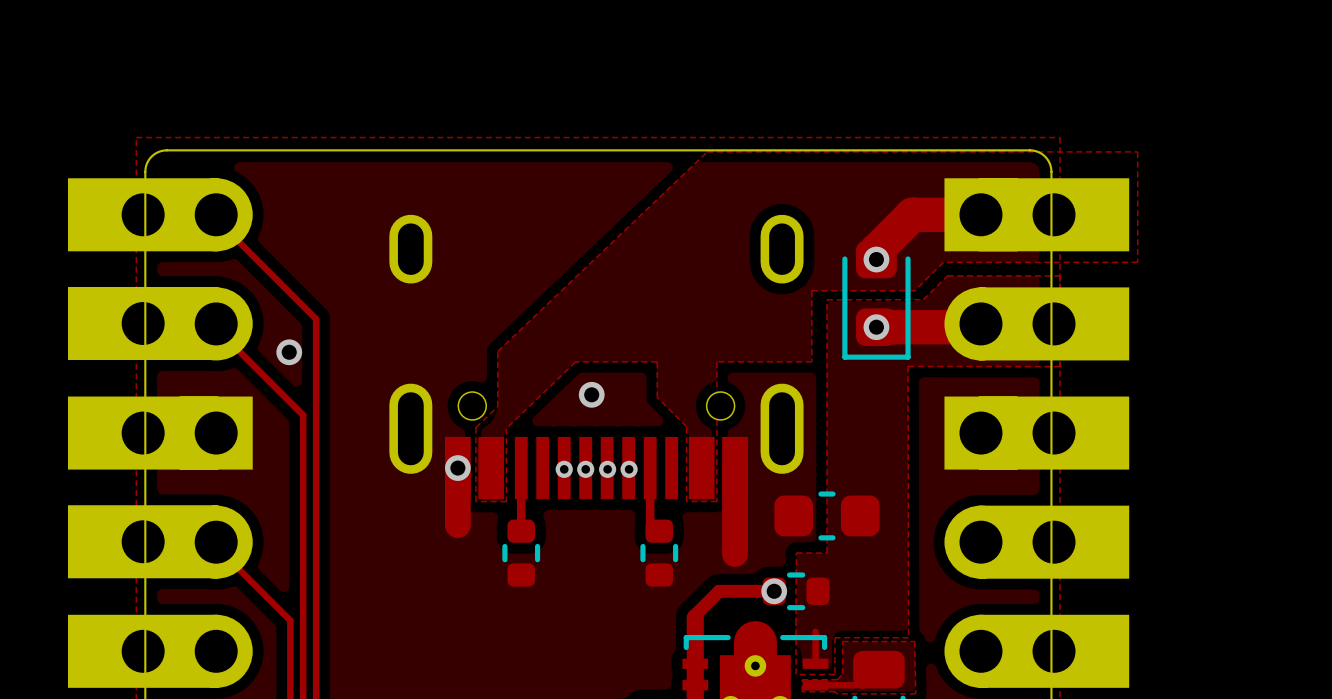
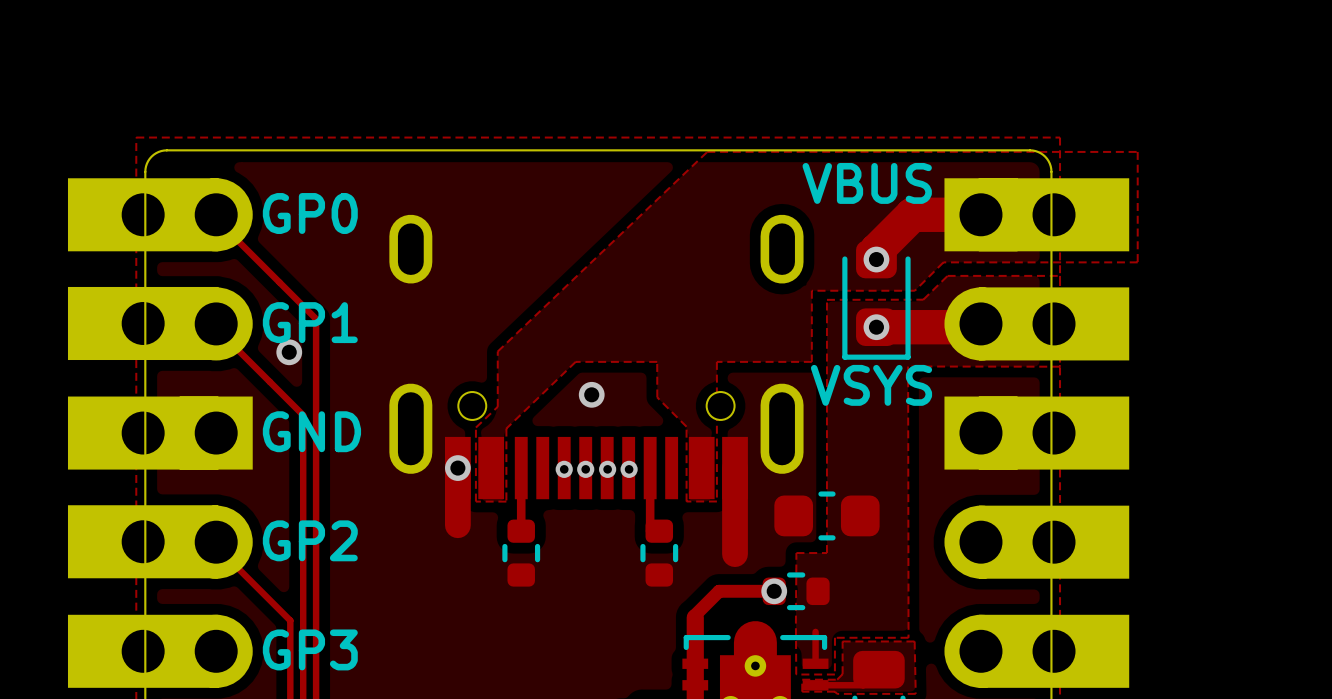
text: none -> VBUS (867, 183)
text: none -> GP0 (310, 213)
text: none -> GP1 (310, 322)
text: none -> VSYS (871, 385)
text: none -> GND (311, 431)
text: none -> GP2 (310, 540)
text: none -> GP3 (310, 649)

